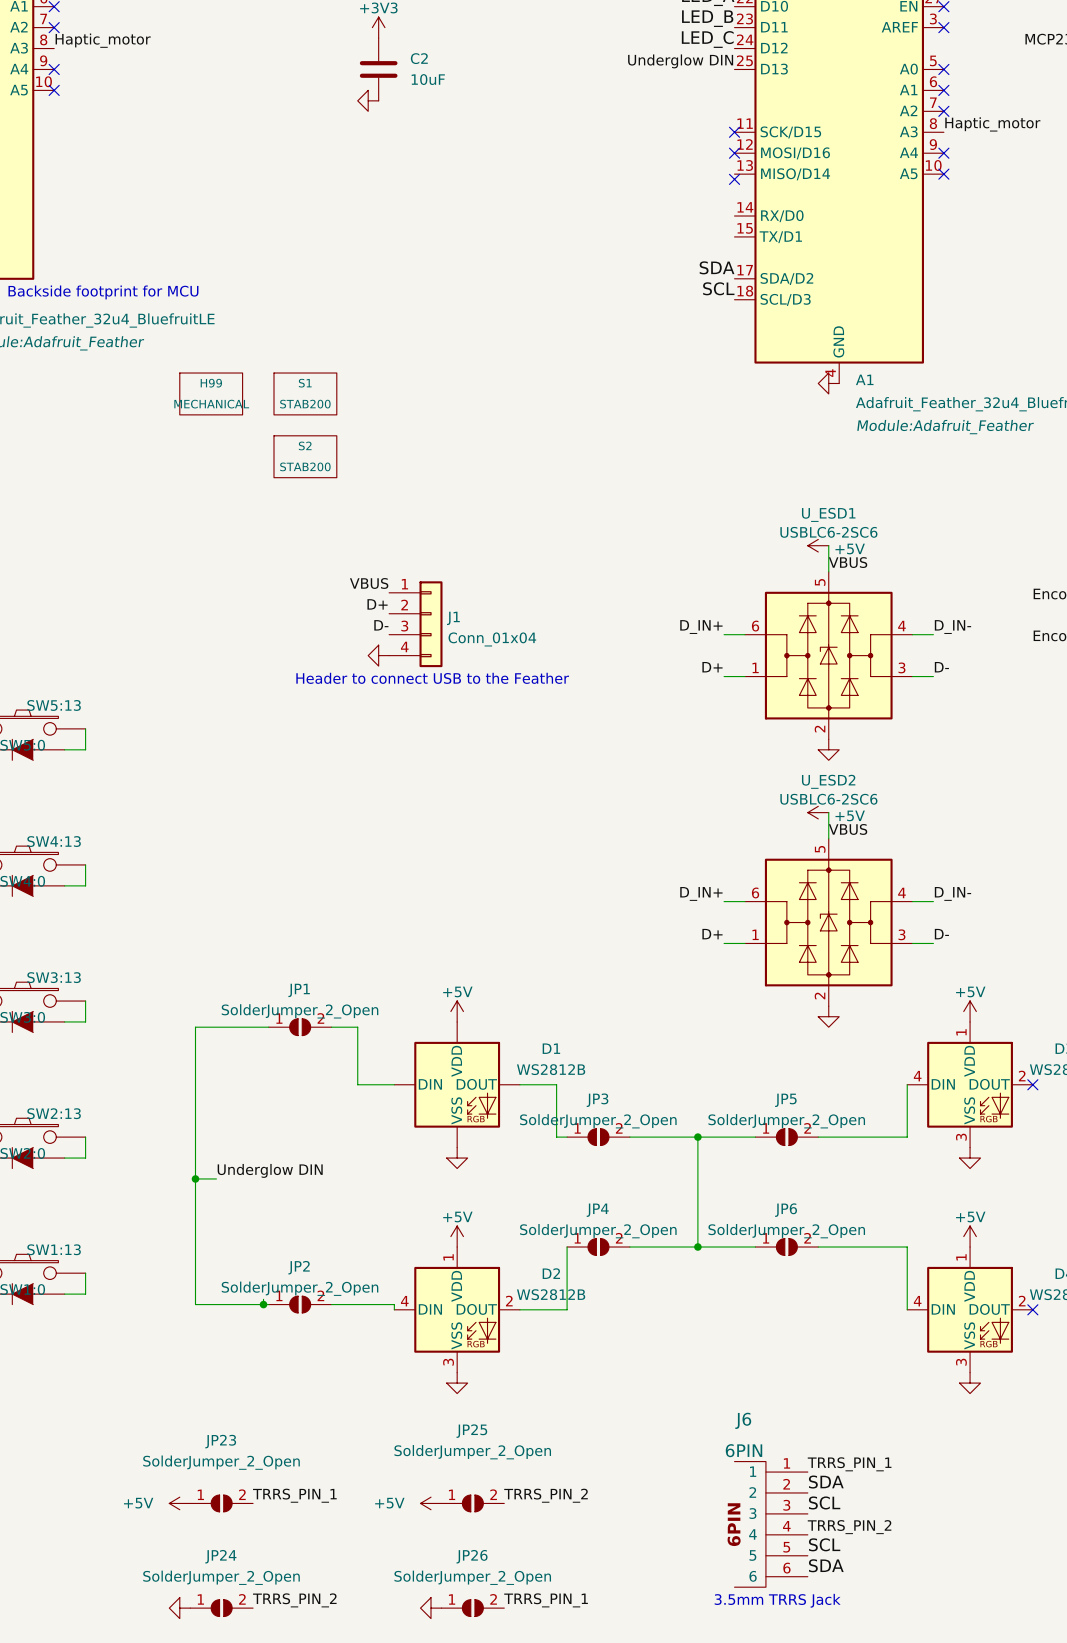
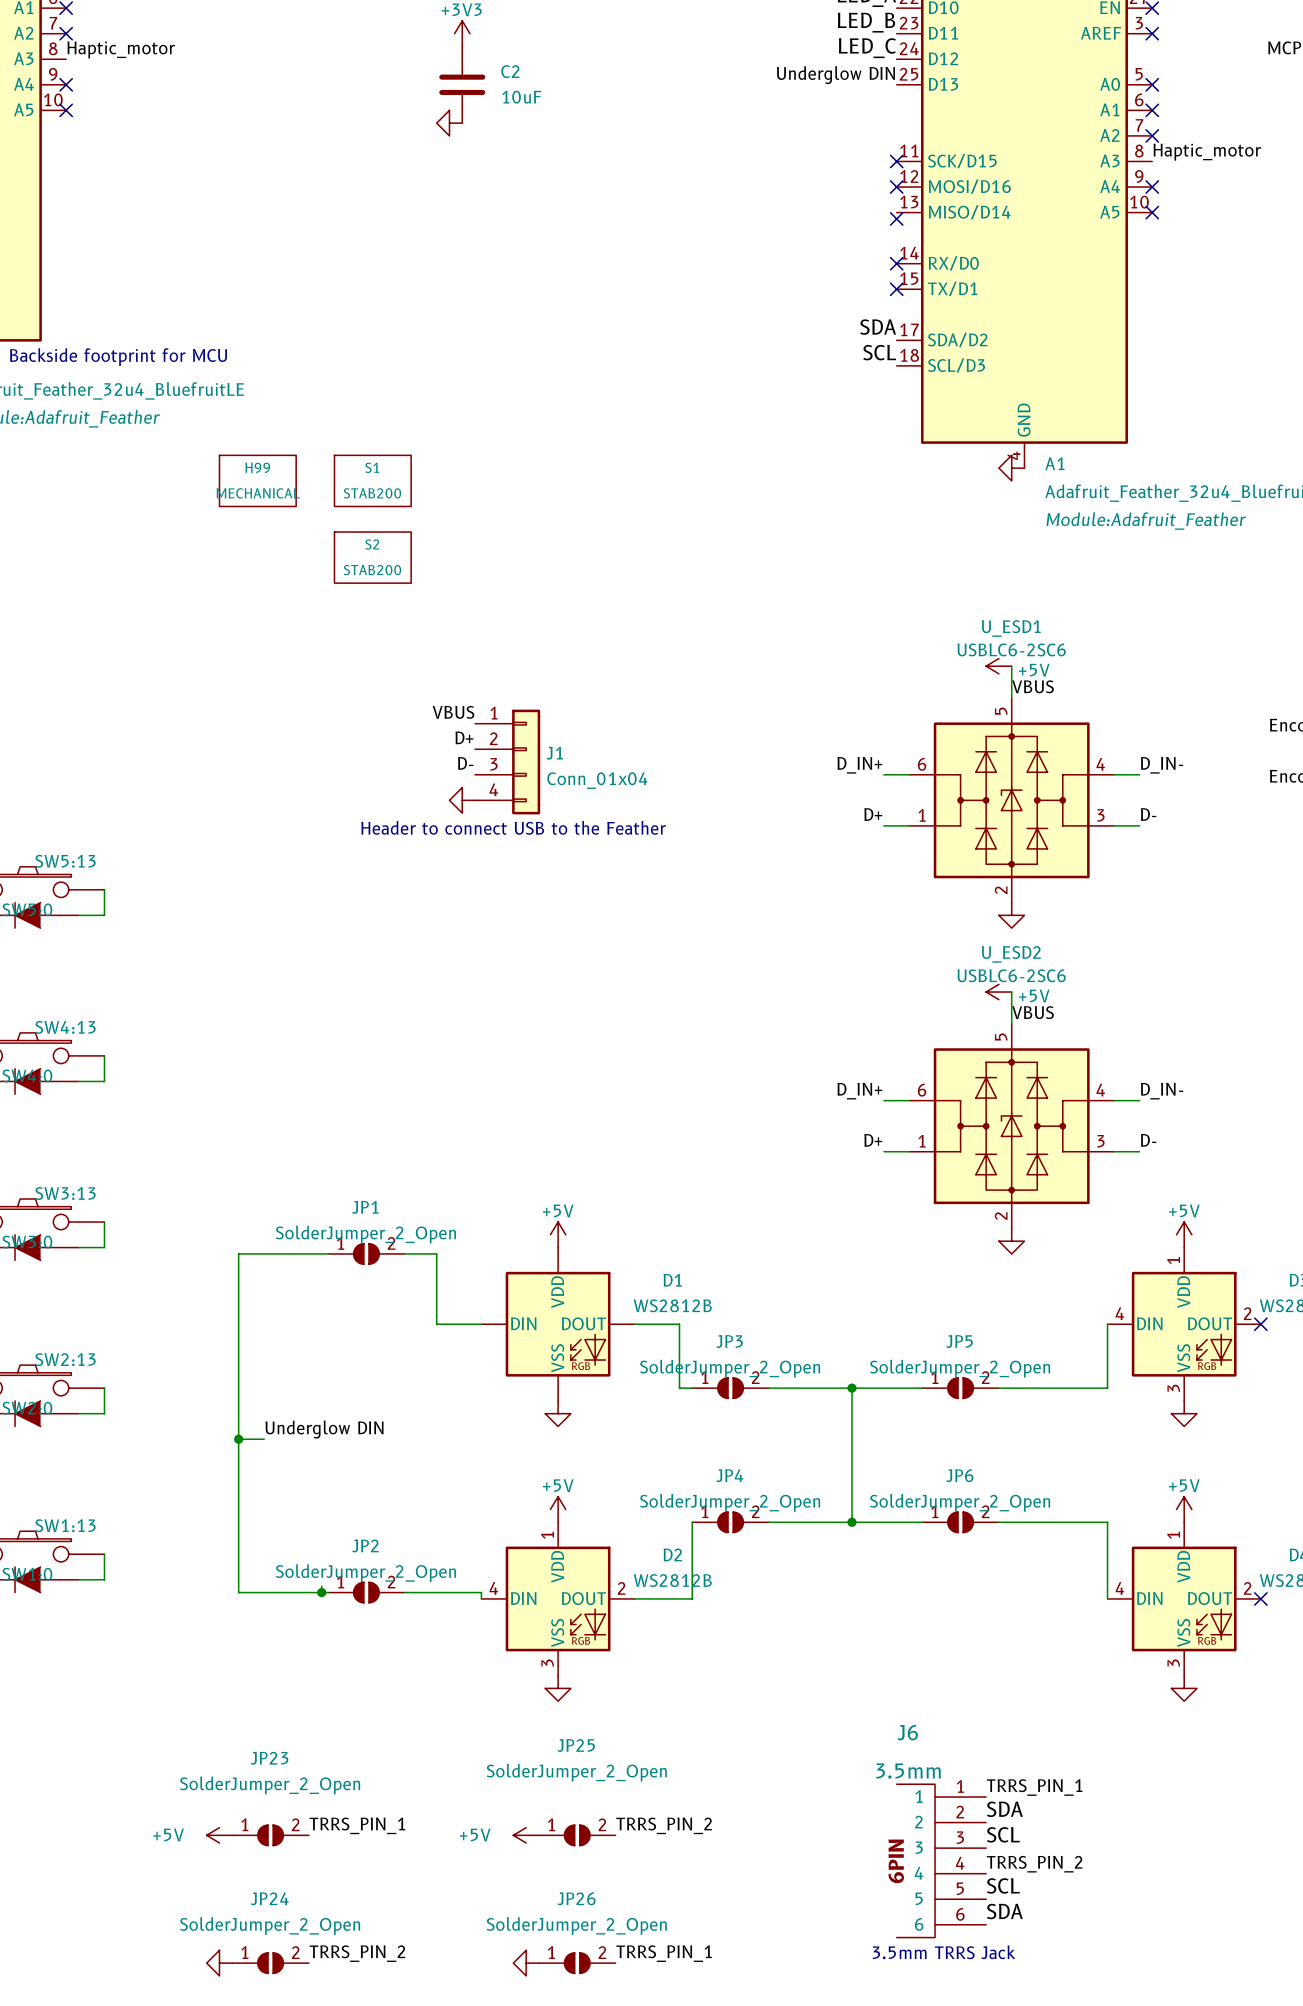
no-connect mark: none -> (896, 263)
no-connect mark: none -> (896, 289)
J6 value: 6PIN (744, 1450) -> 3.5mm (908, 1771)

